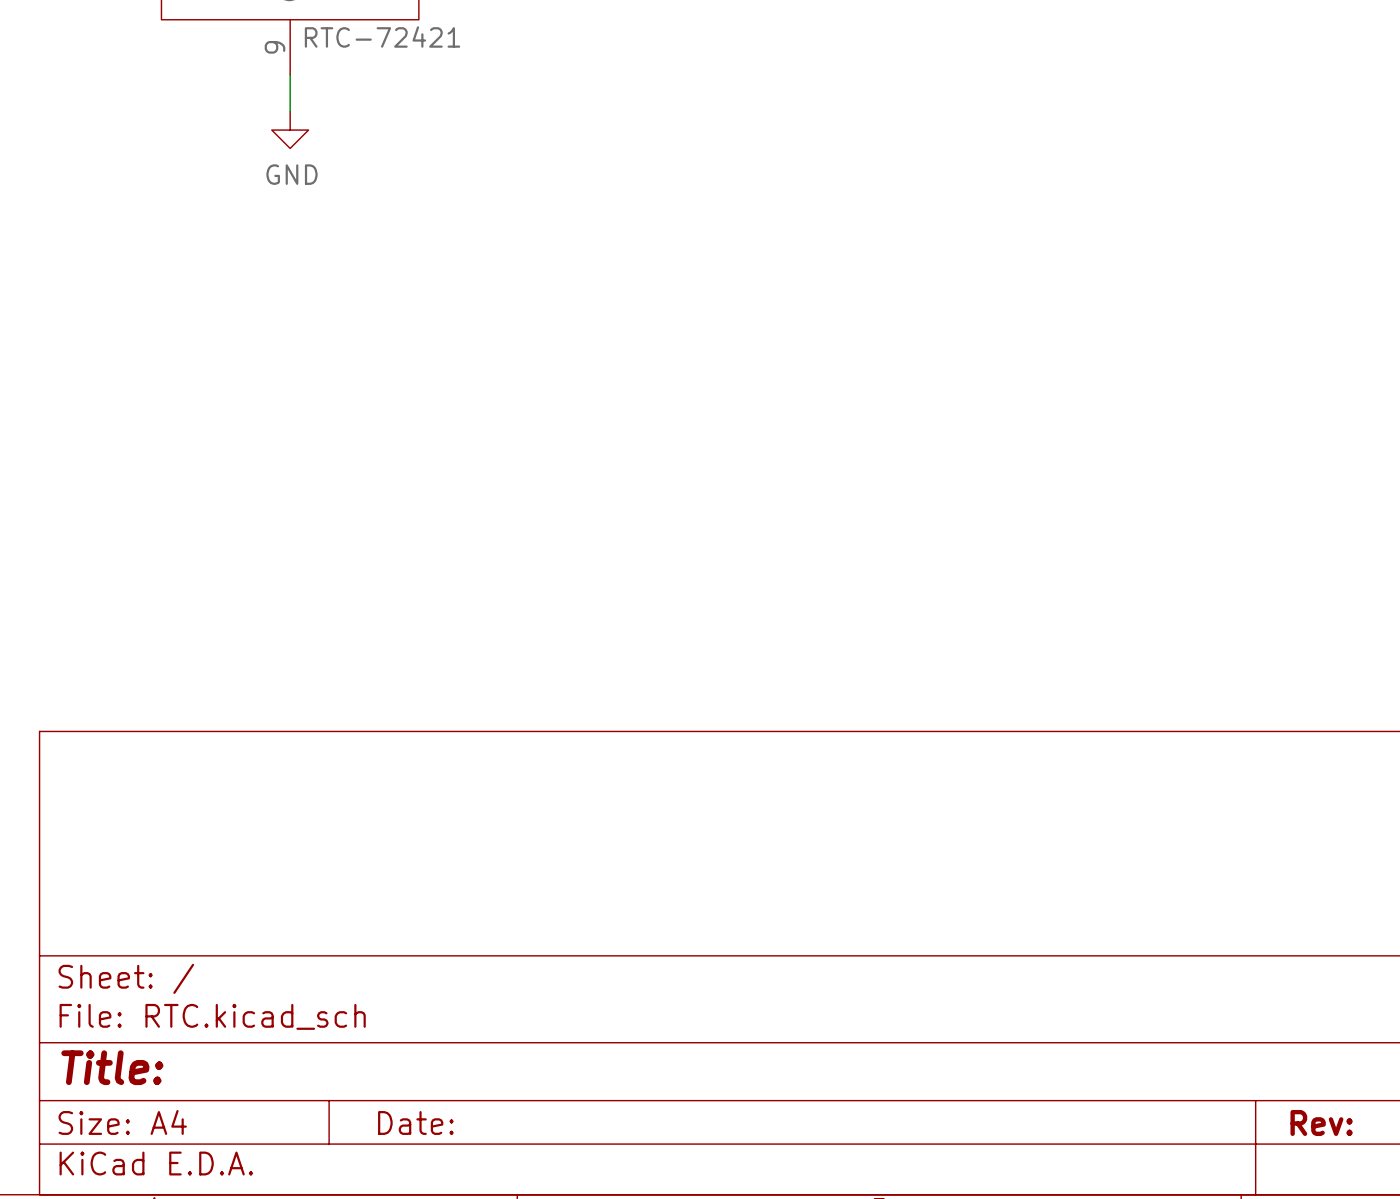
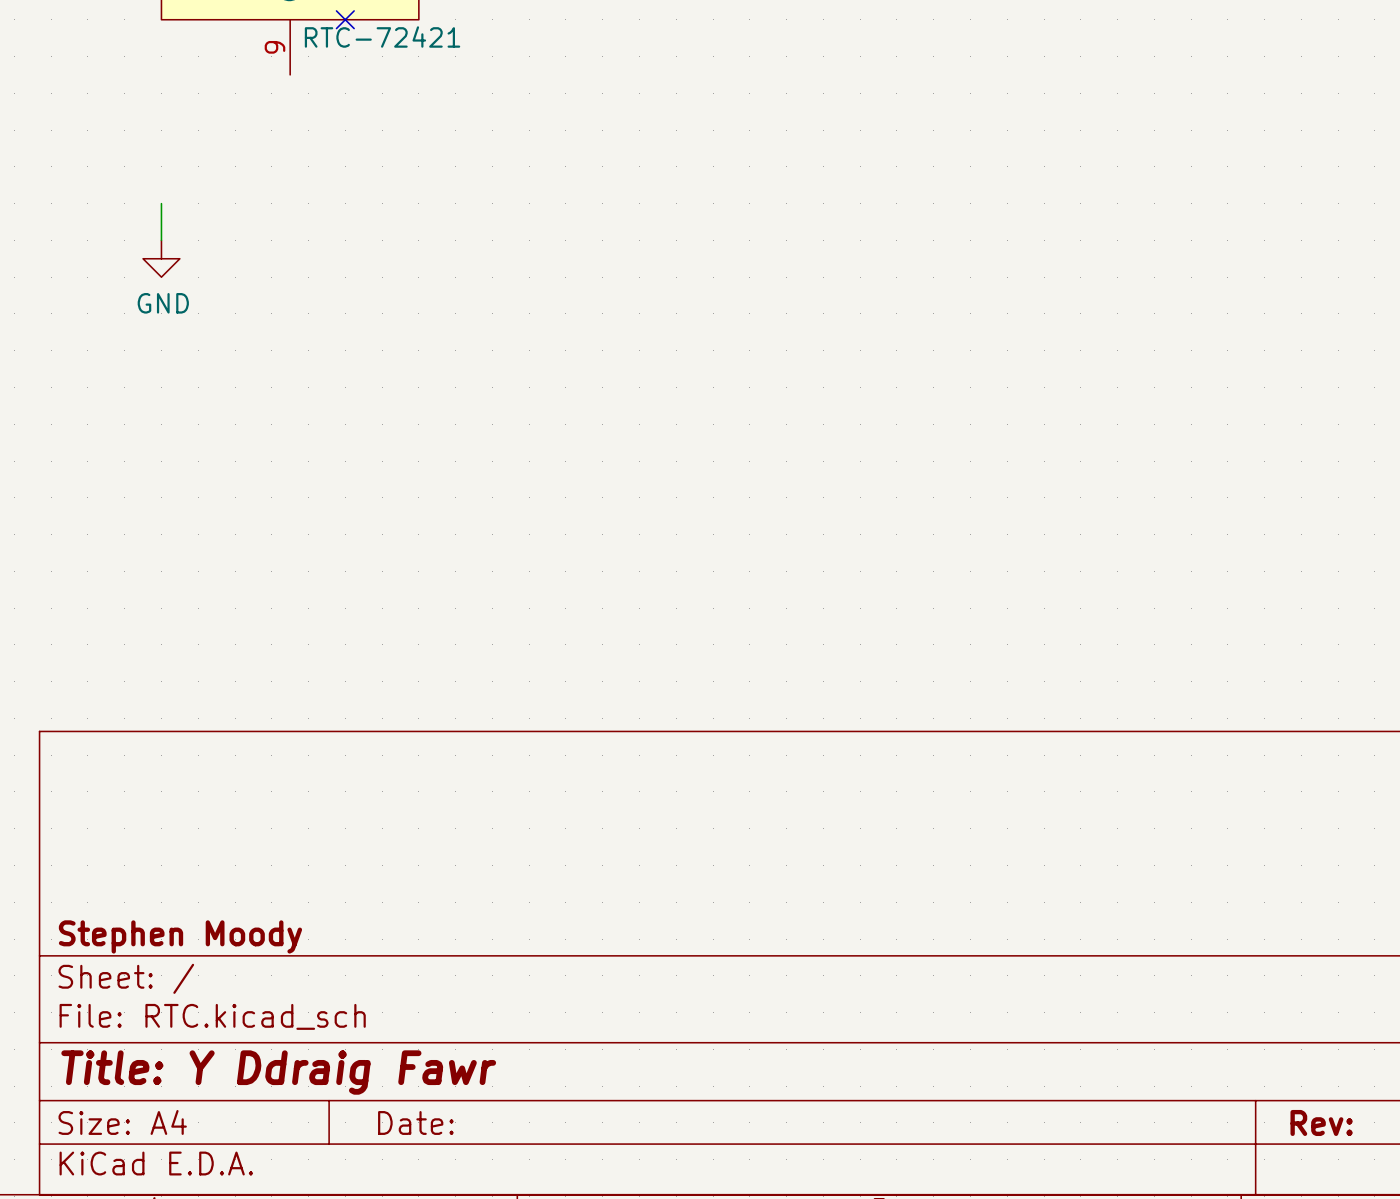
no-connect mark: none -> (345, 19)
wire: (290, 74) (290, 111) -> (161, 203) (161, 240)
power symbol position: GND (290, 130) -> GND (161, 258)
title block: none -> Stephen Moody (180, 936)
title block: Title: (112, 1067) -> Title: Y Ddraig Fawr (278, 1072)

